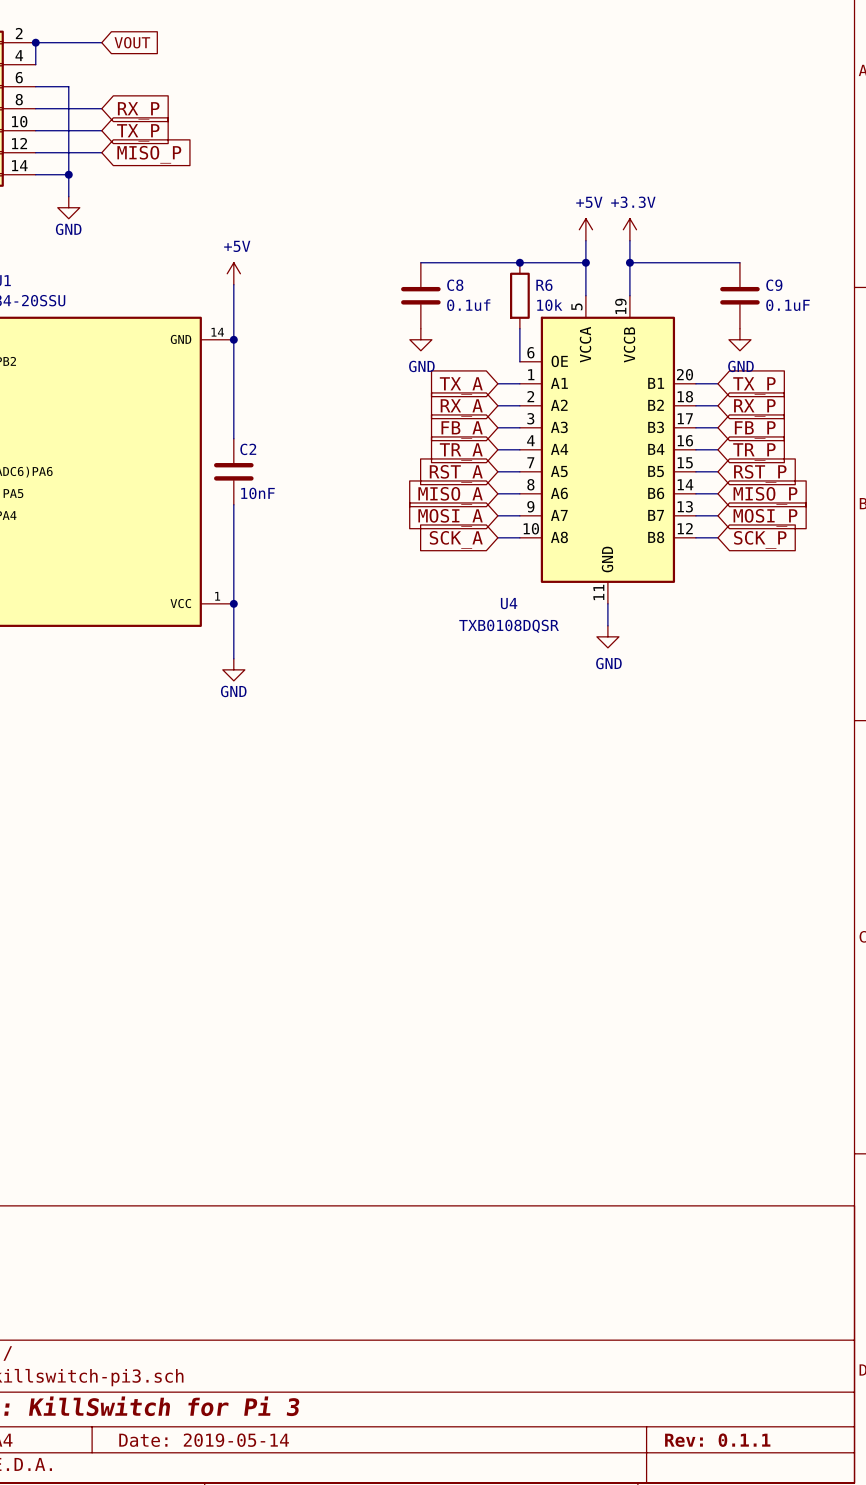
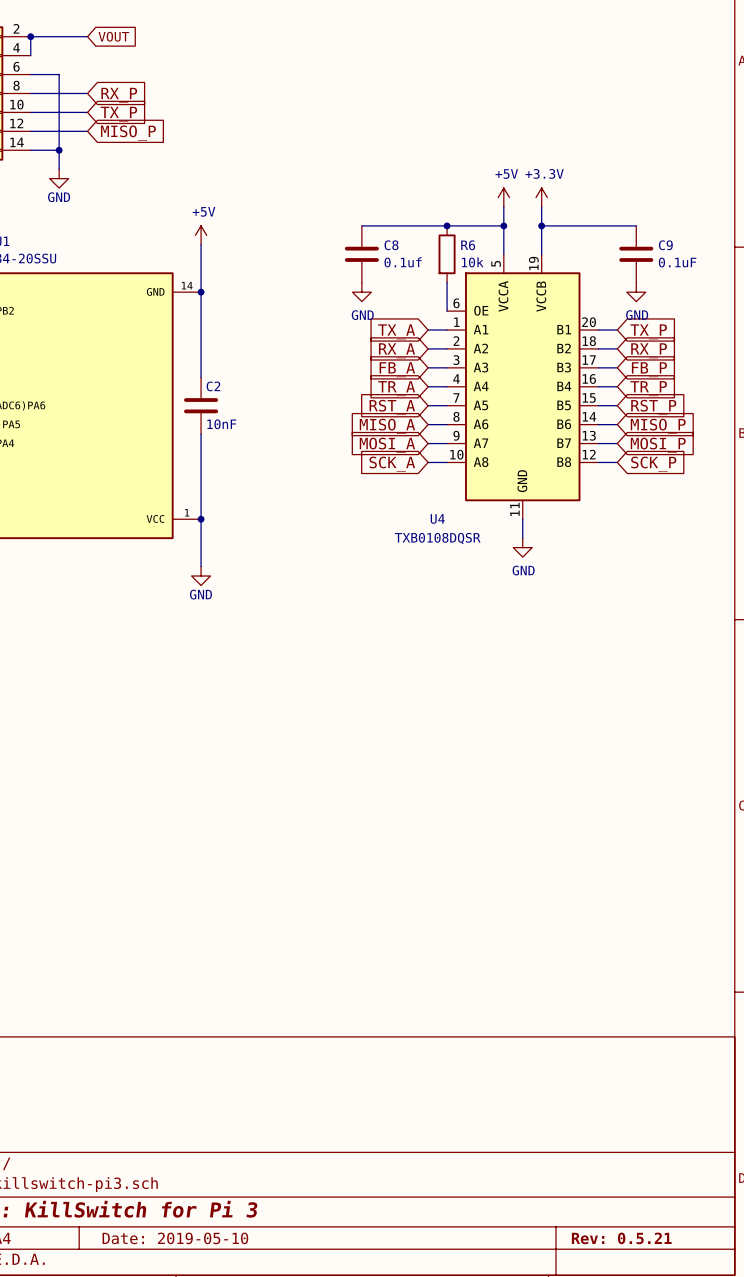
title block: Date: 2019-05-14 (204, 1440) -> Date: 2019-05-10 (175, 1238)
title block: Rev: 0.1.1 (717, 1440) -> Rev: 0.5.21 (621, 1238)

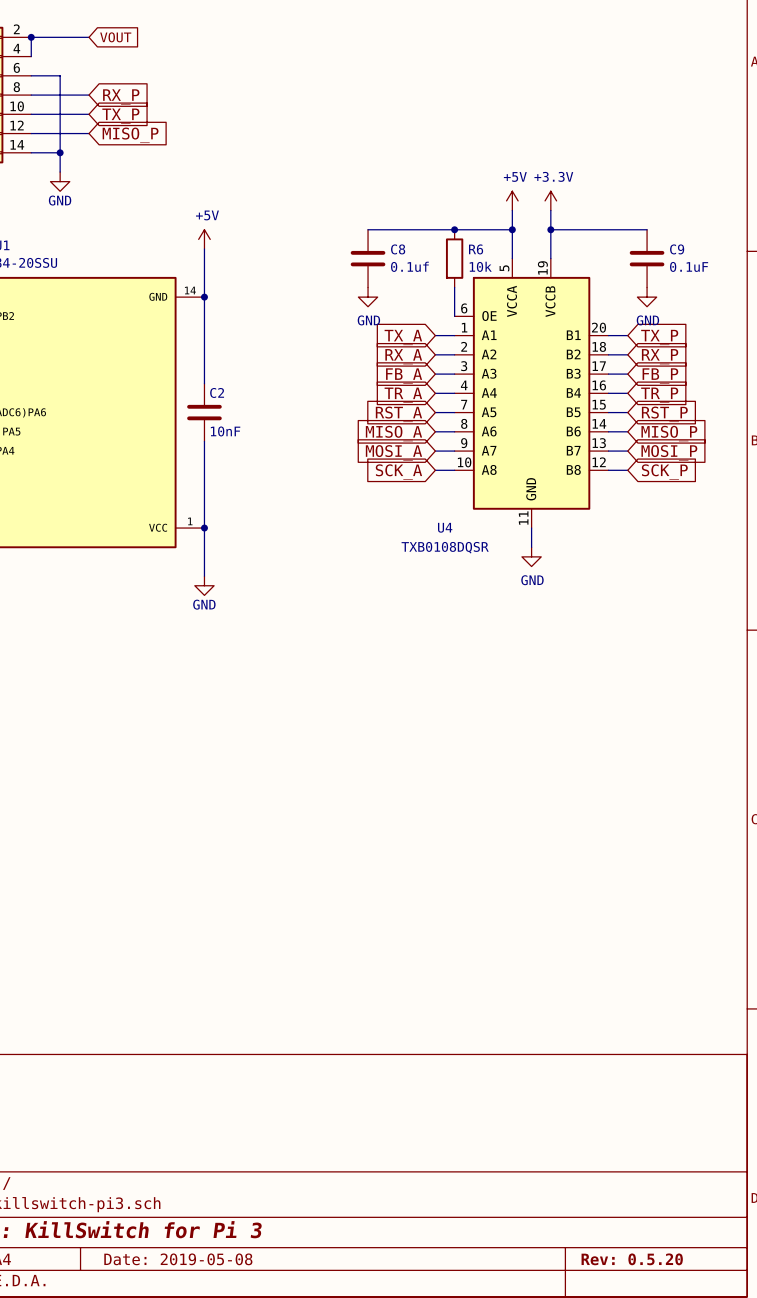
title block: Date: 2019-05-10 (175, 1238) -> Date: 2019-05-08 (178, 1259)
title block: Rev: 0.5.21 (621, 1238) -> Rev: 0.5.20 (632, 1259)

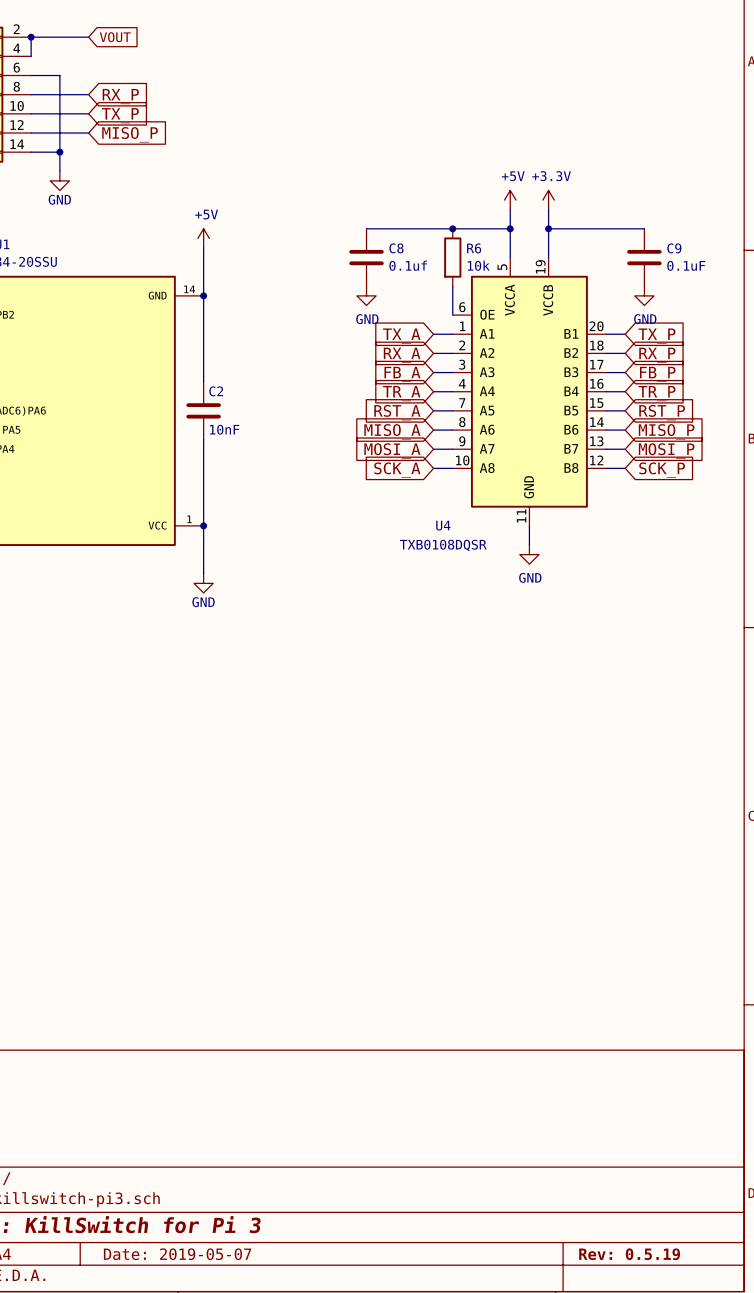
title block: Date: 2019-05-08 (178, 1259) -> Date: 2019-05-07 (177, 1254)
title block: Rev: 0.5.20 (632, 1259) -> Rev: 0.5.19 (629, 1254)

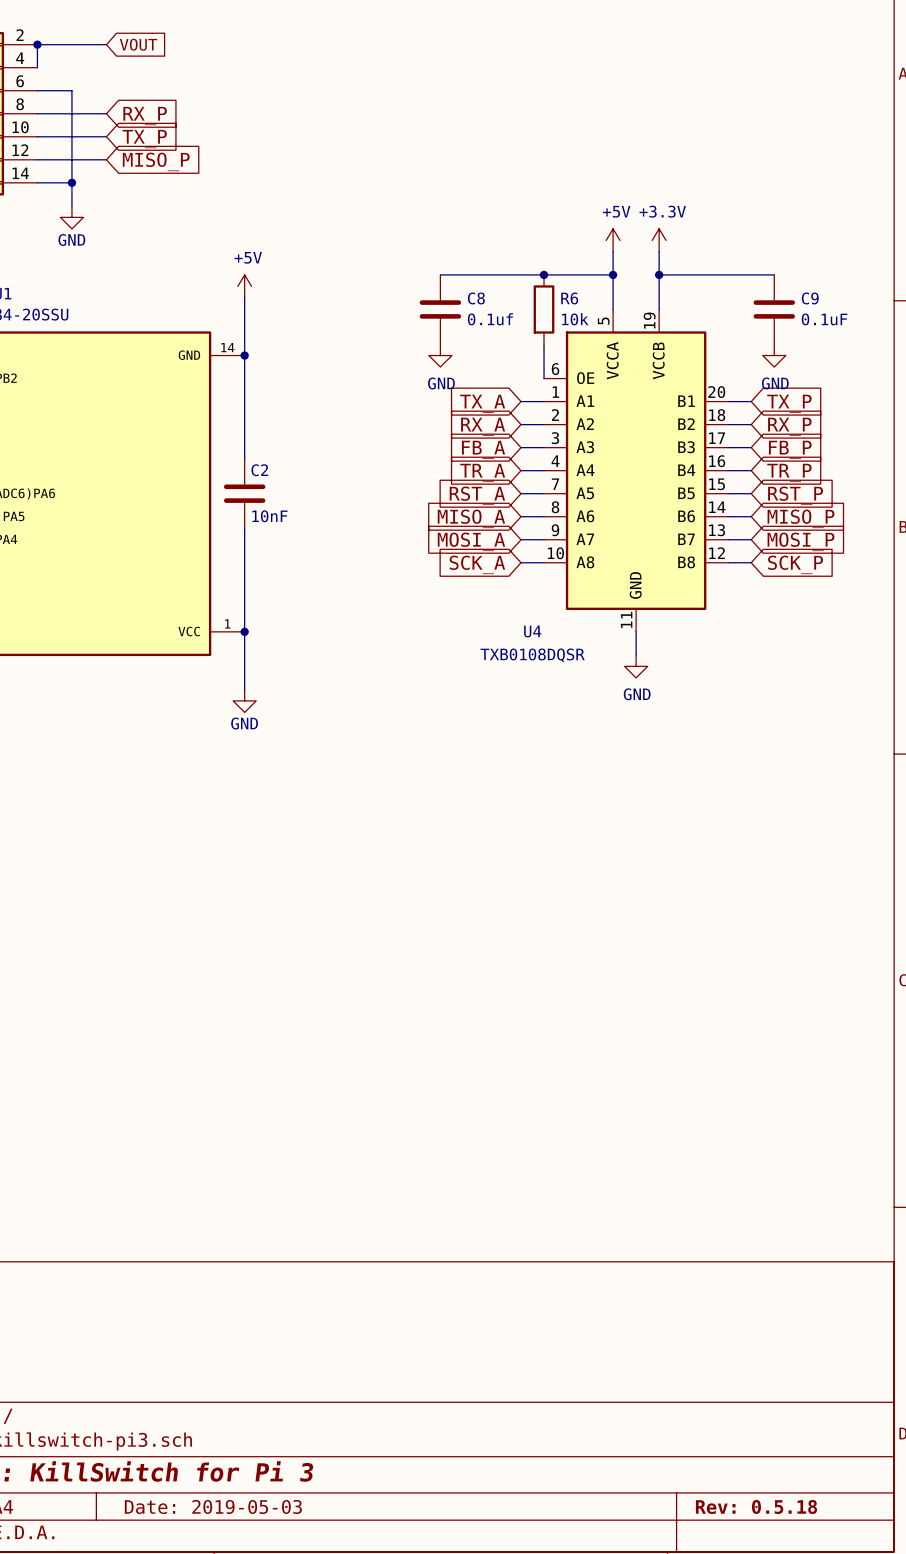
title block: Date: 2019-05-07 (177, 1254) -> Date: 2019-05-03 (213, 1506)
title block: Rev: 0.5.19 (629, 1254) -> Rev: 0.5.18 (756, 1506)

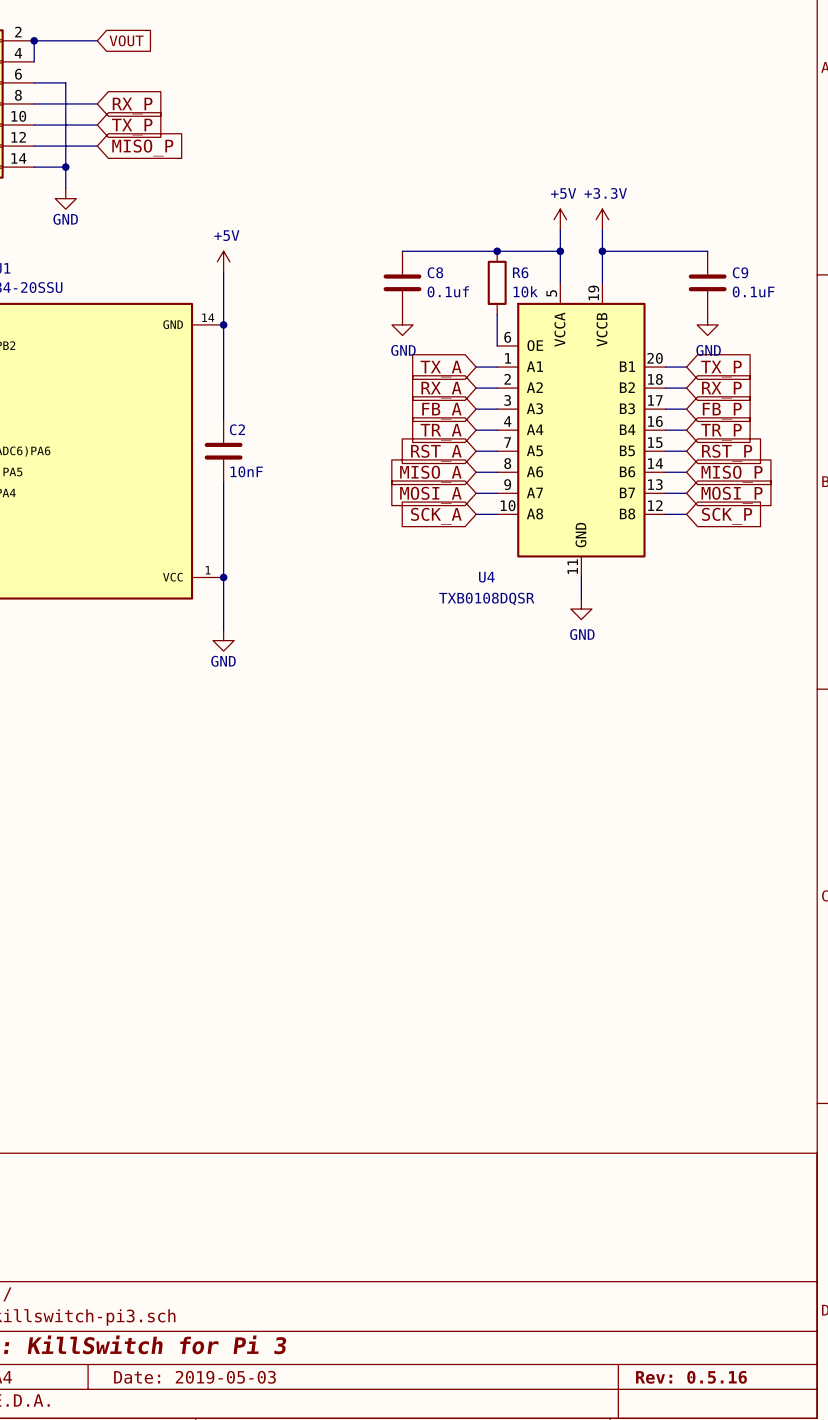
title block: Rev: 0.5.18 (756, 1506) -> Rev: 0.5.16 (691, 1377)

